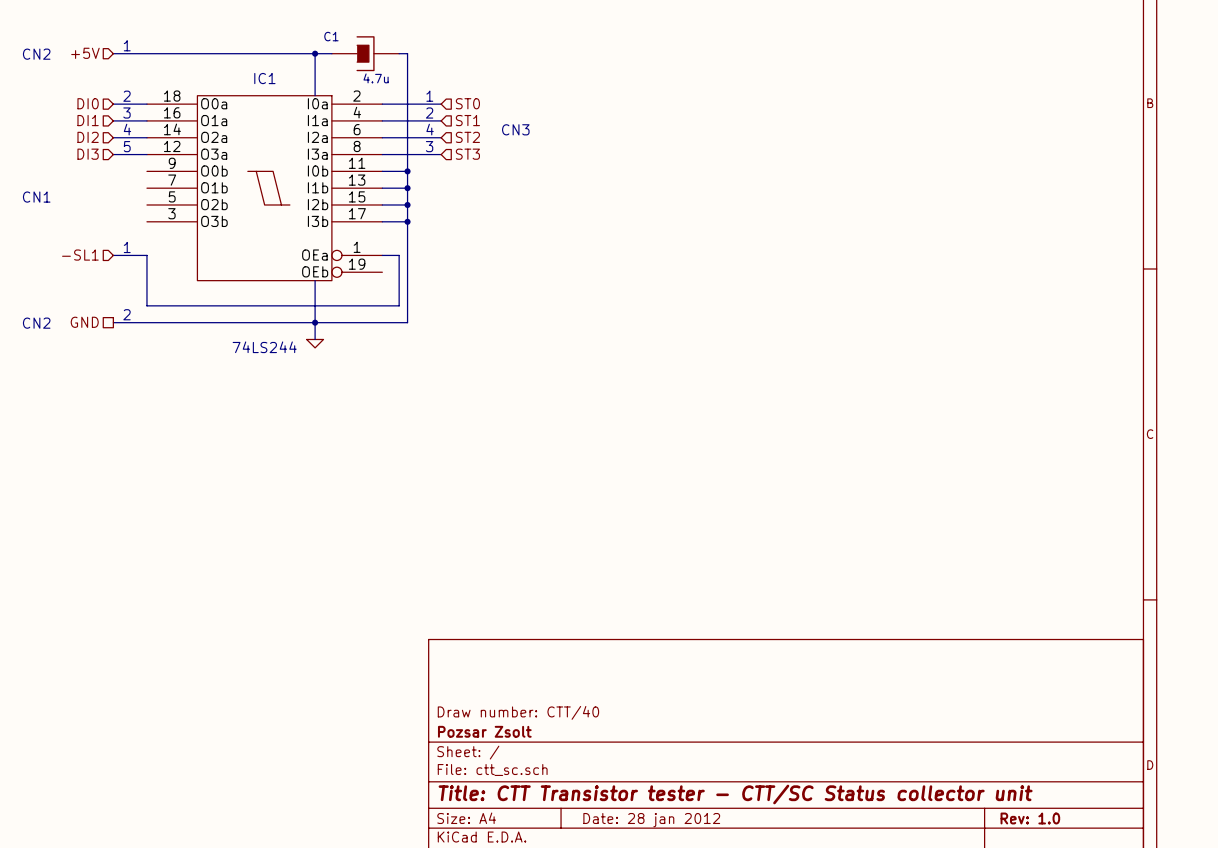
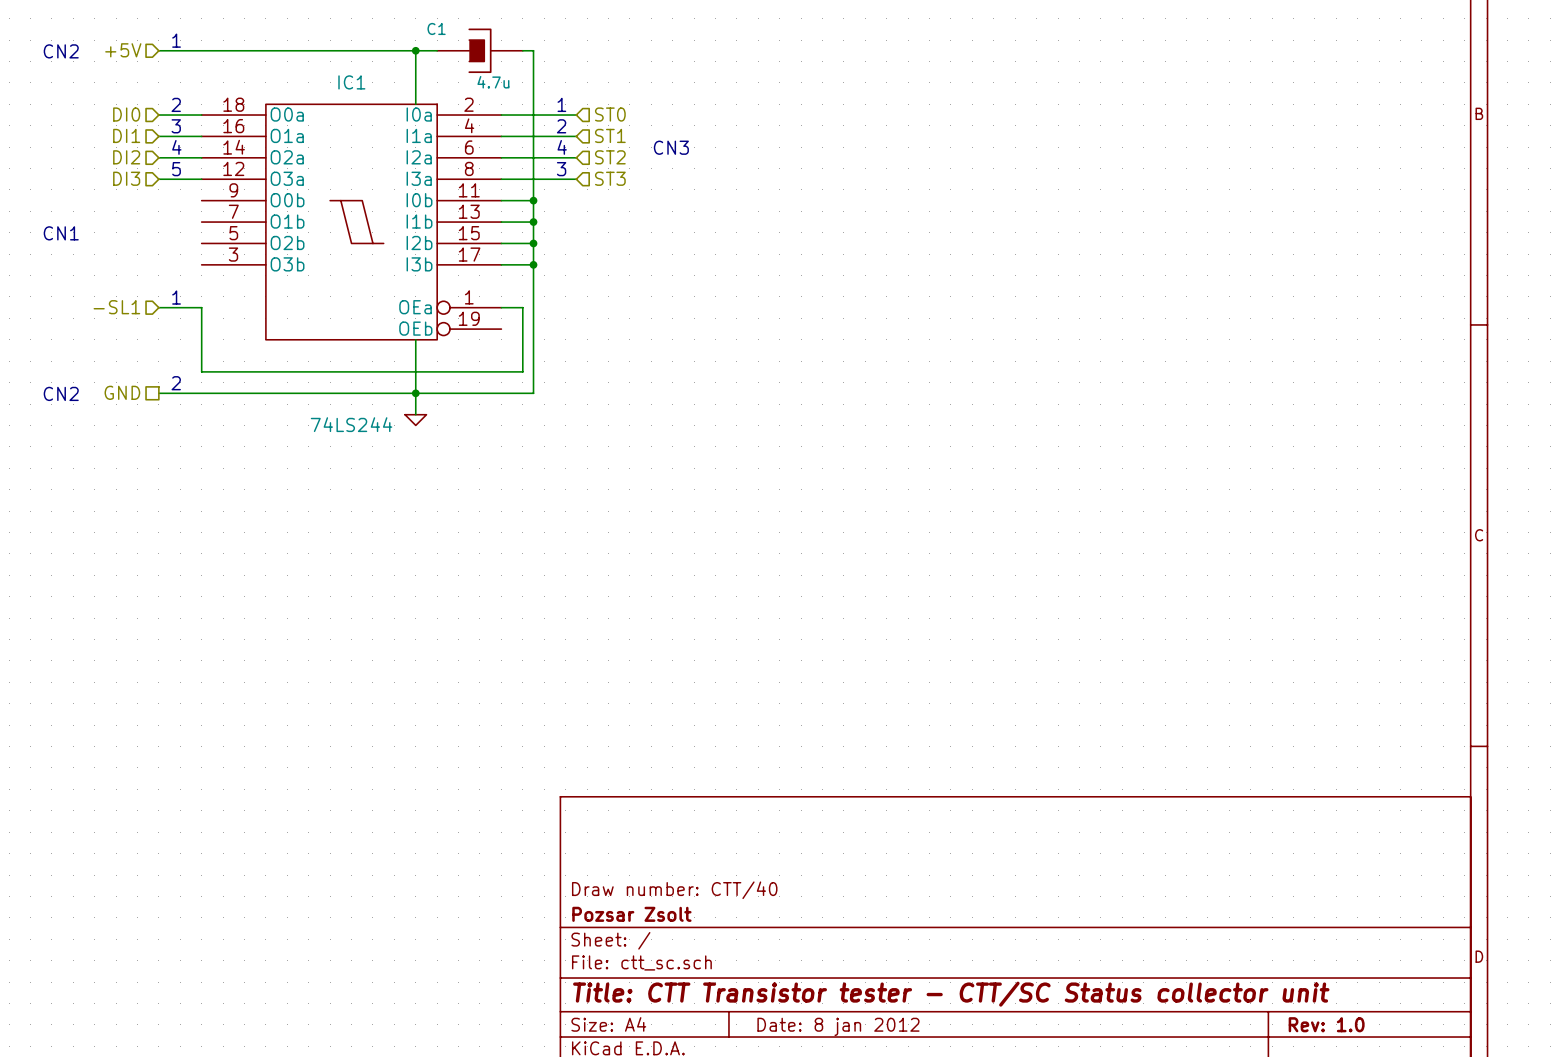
title block: Date: 28 jan 2012 (651, 820) -> Date: 8 jan 2012 (838, 1026)

